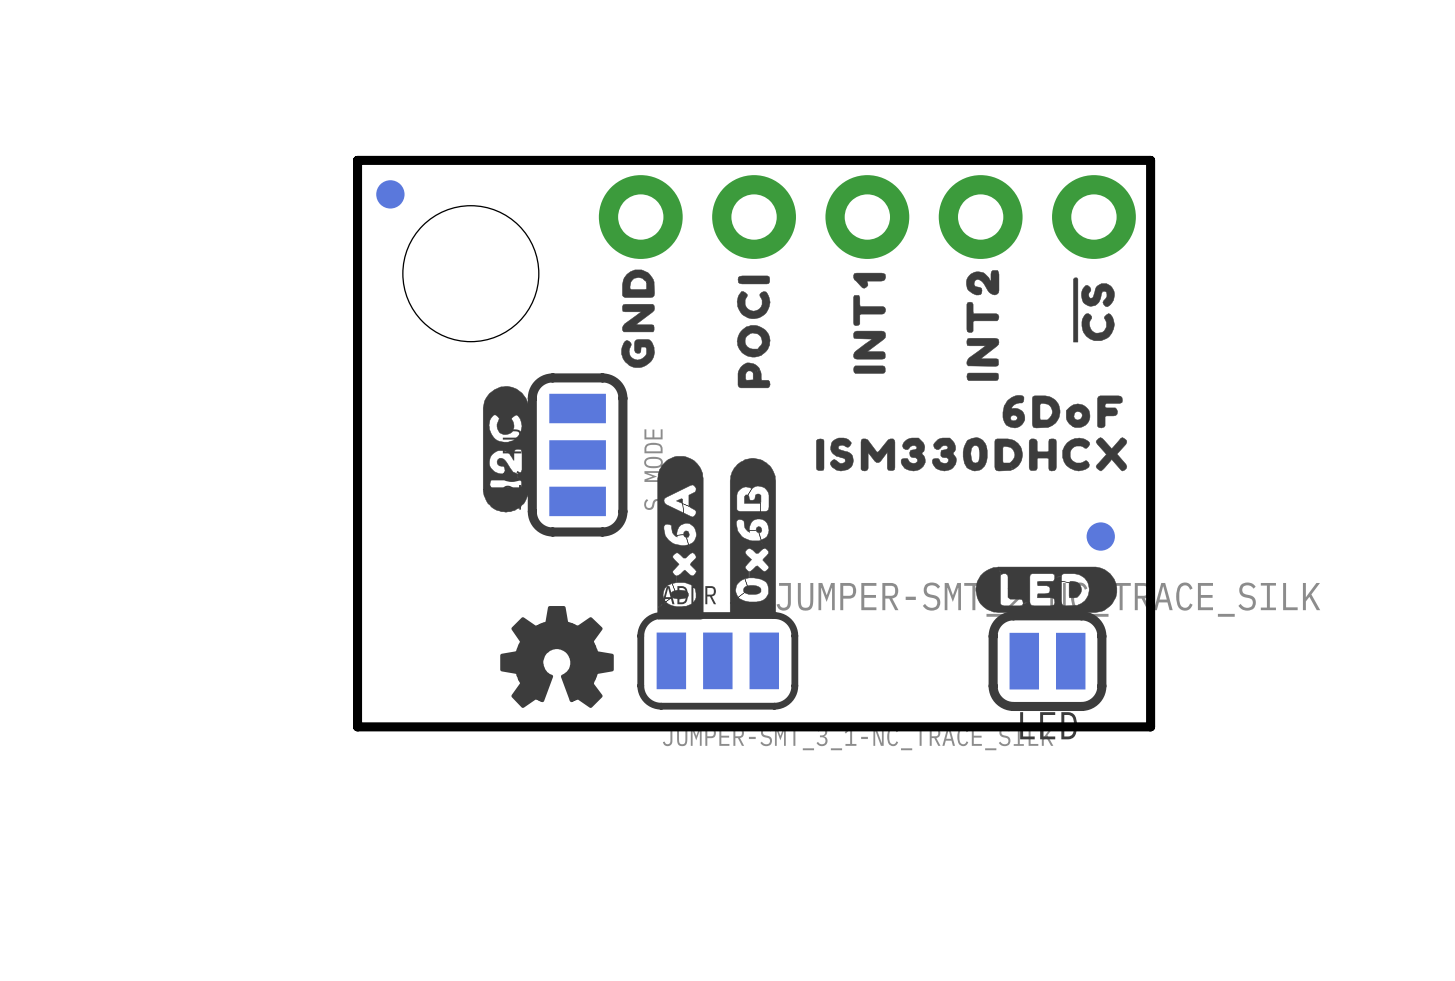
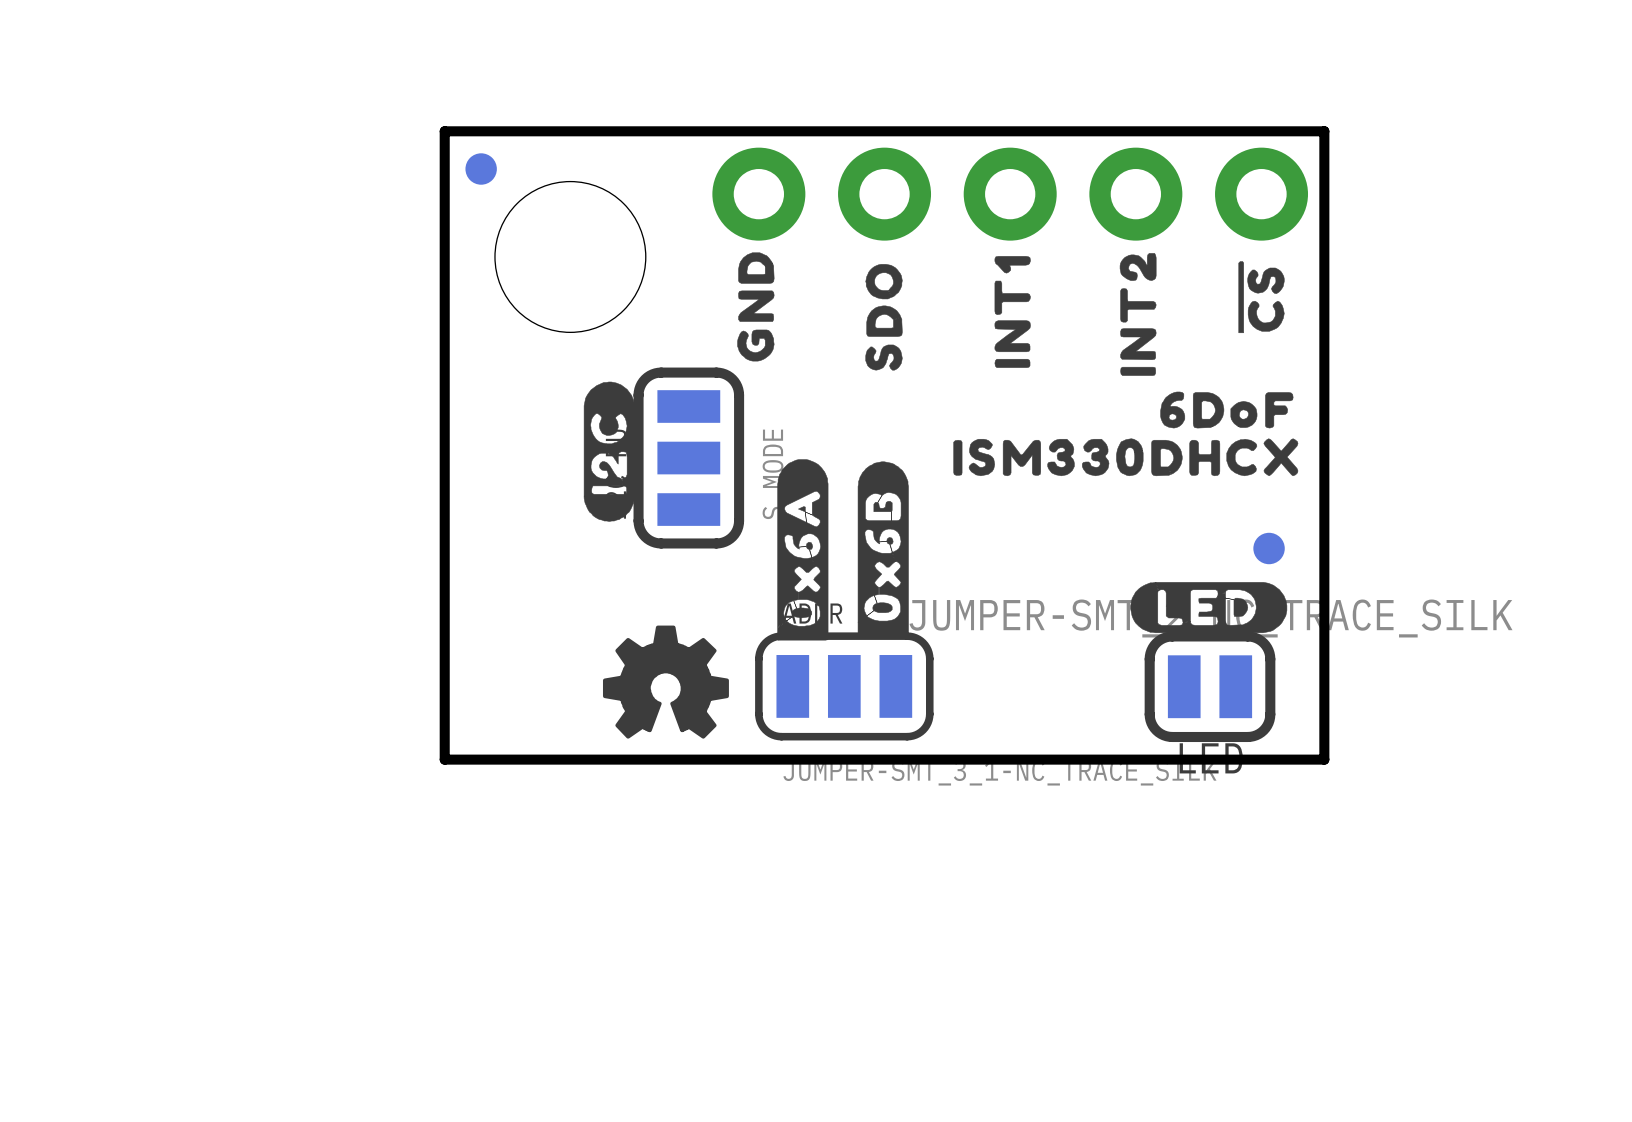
drawing shape: [736, 275, 771, 389] -> [865, 264, 903, 371]

